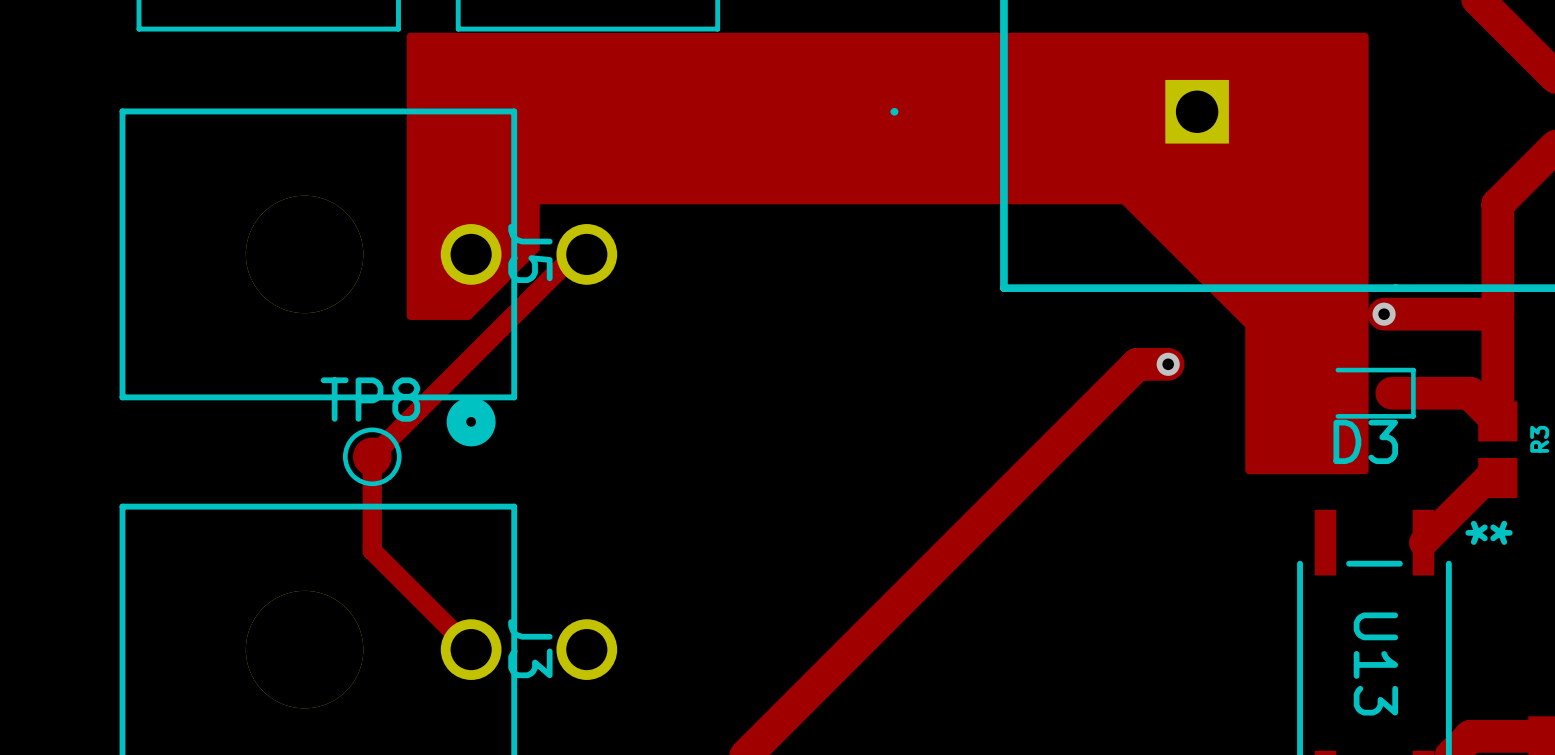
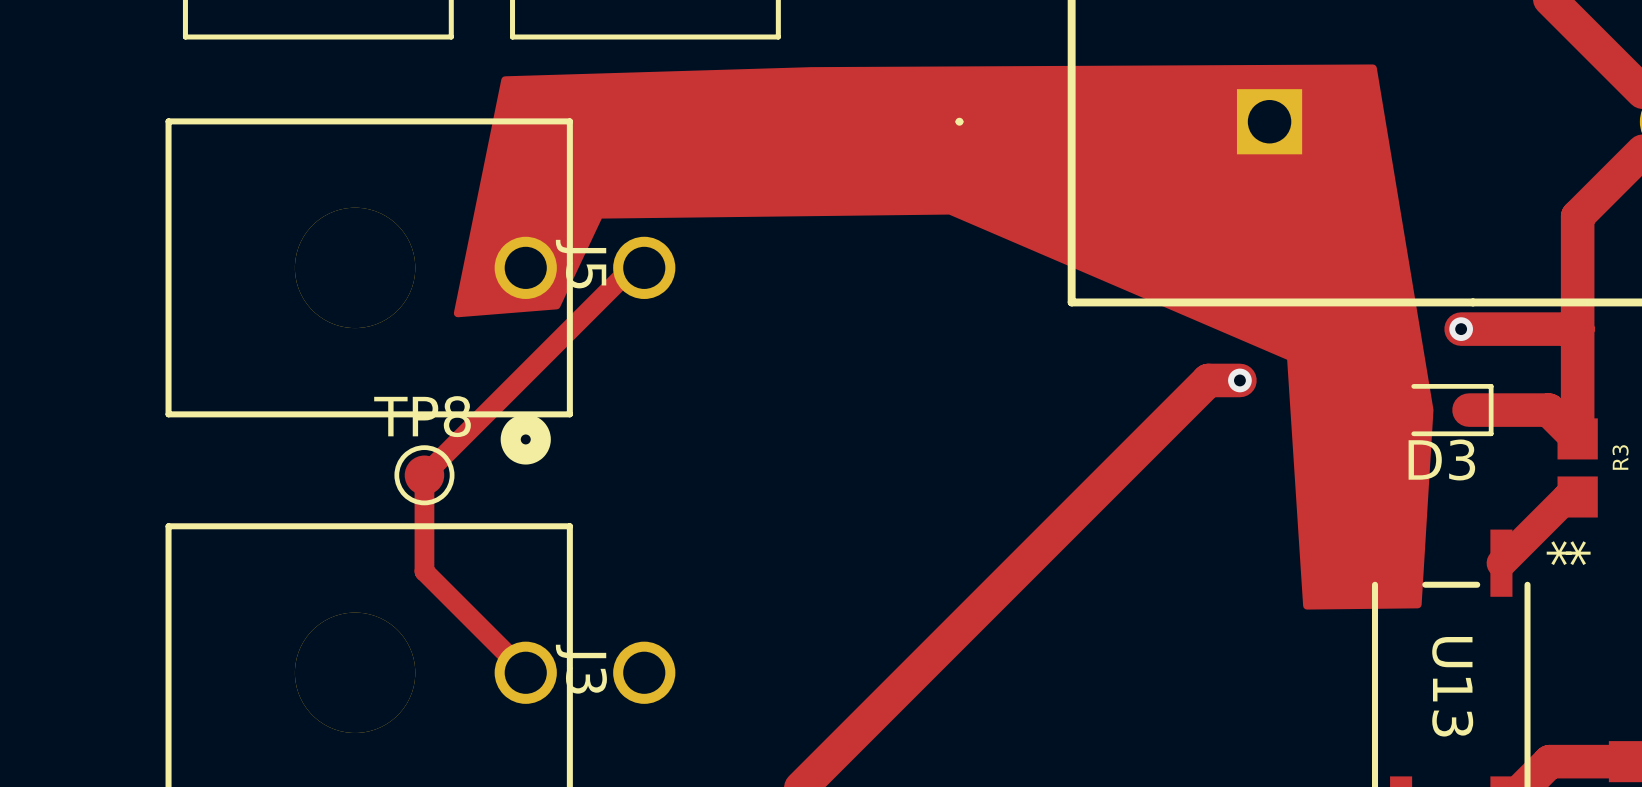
drawing: [406, 32, 1369, 475] -> none
drawing: none -> [453, 64, 1434, 610]

